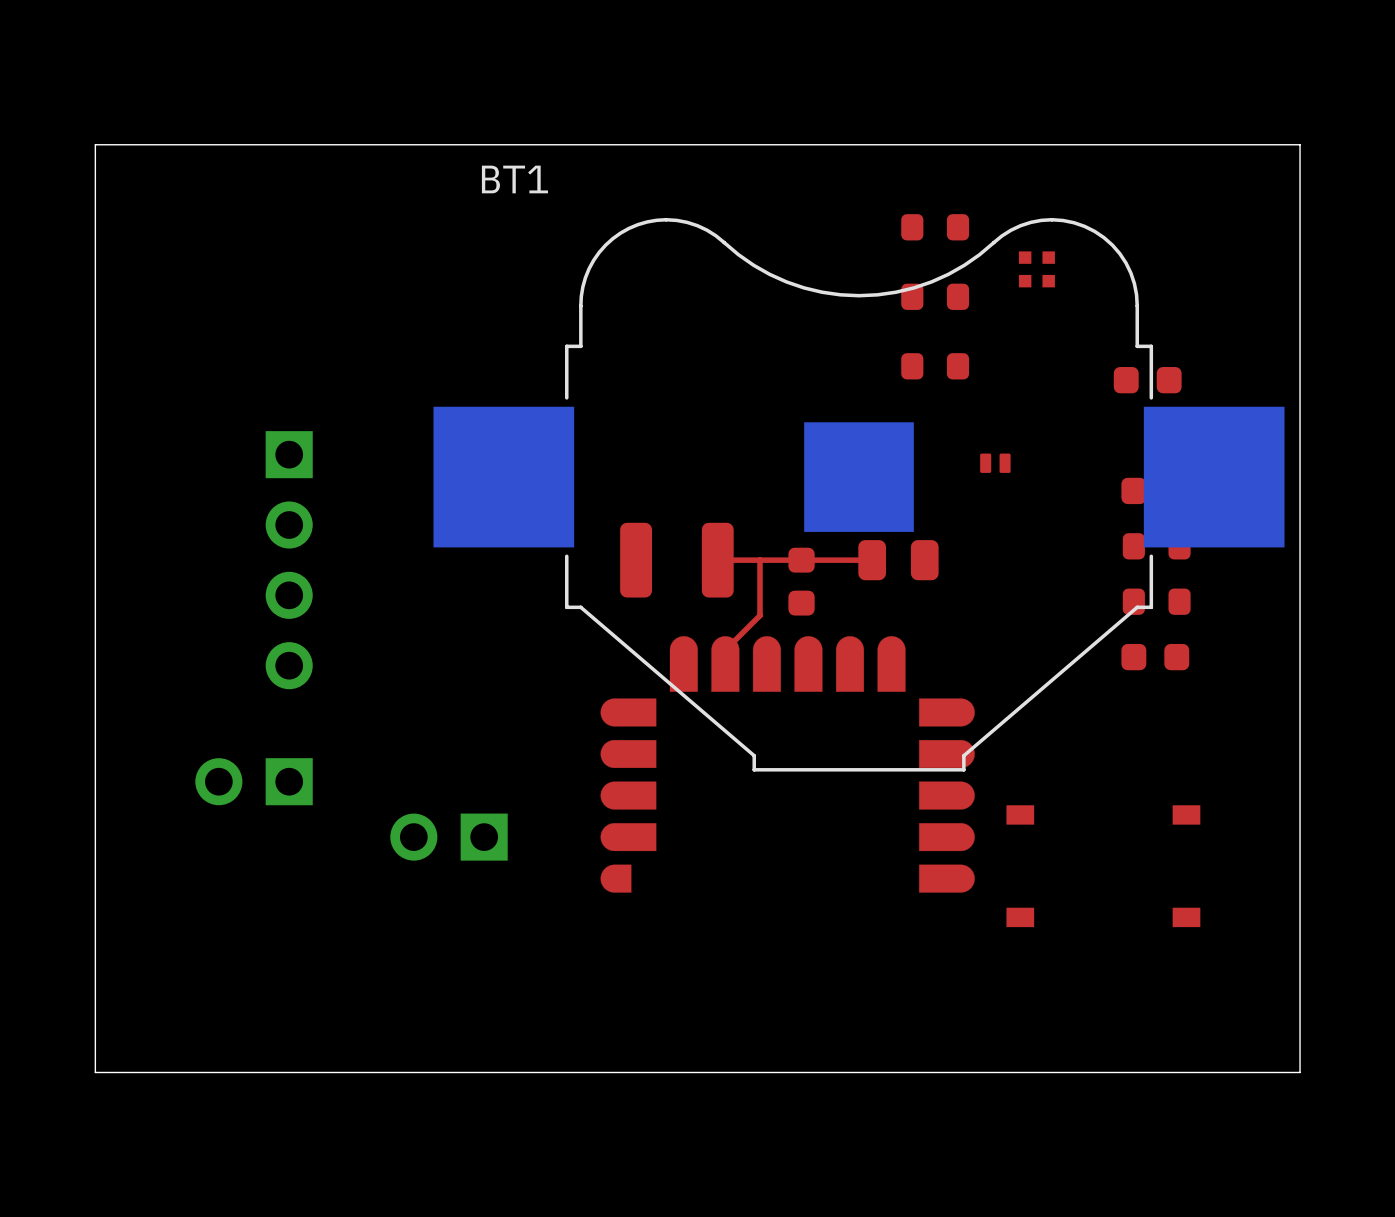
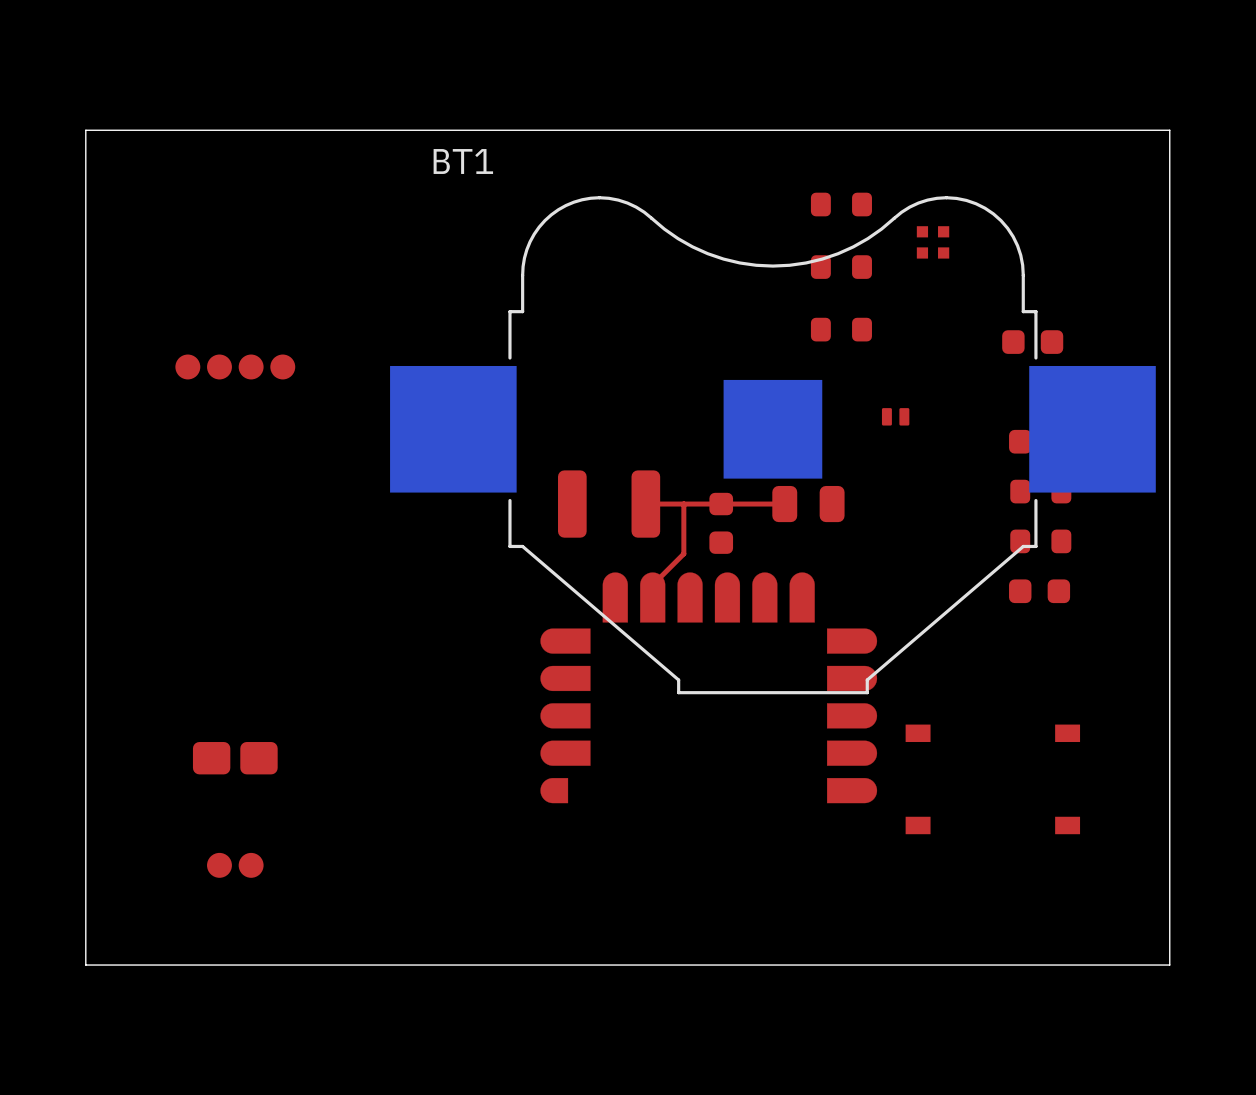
part: none -> (235, 366)
part: (289, 560) -> none
part: (254, 781) -> none
part: (449, 837) -> none
part: none -> (235, 758)
part: none -> (235, 865)

